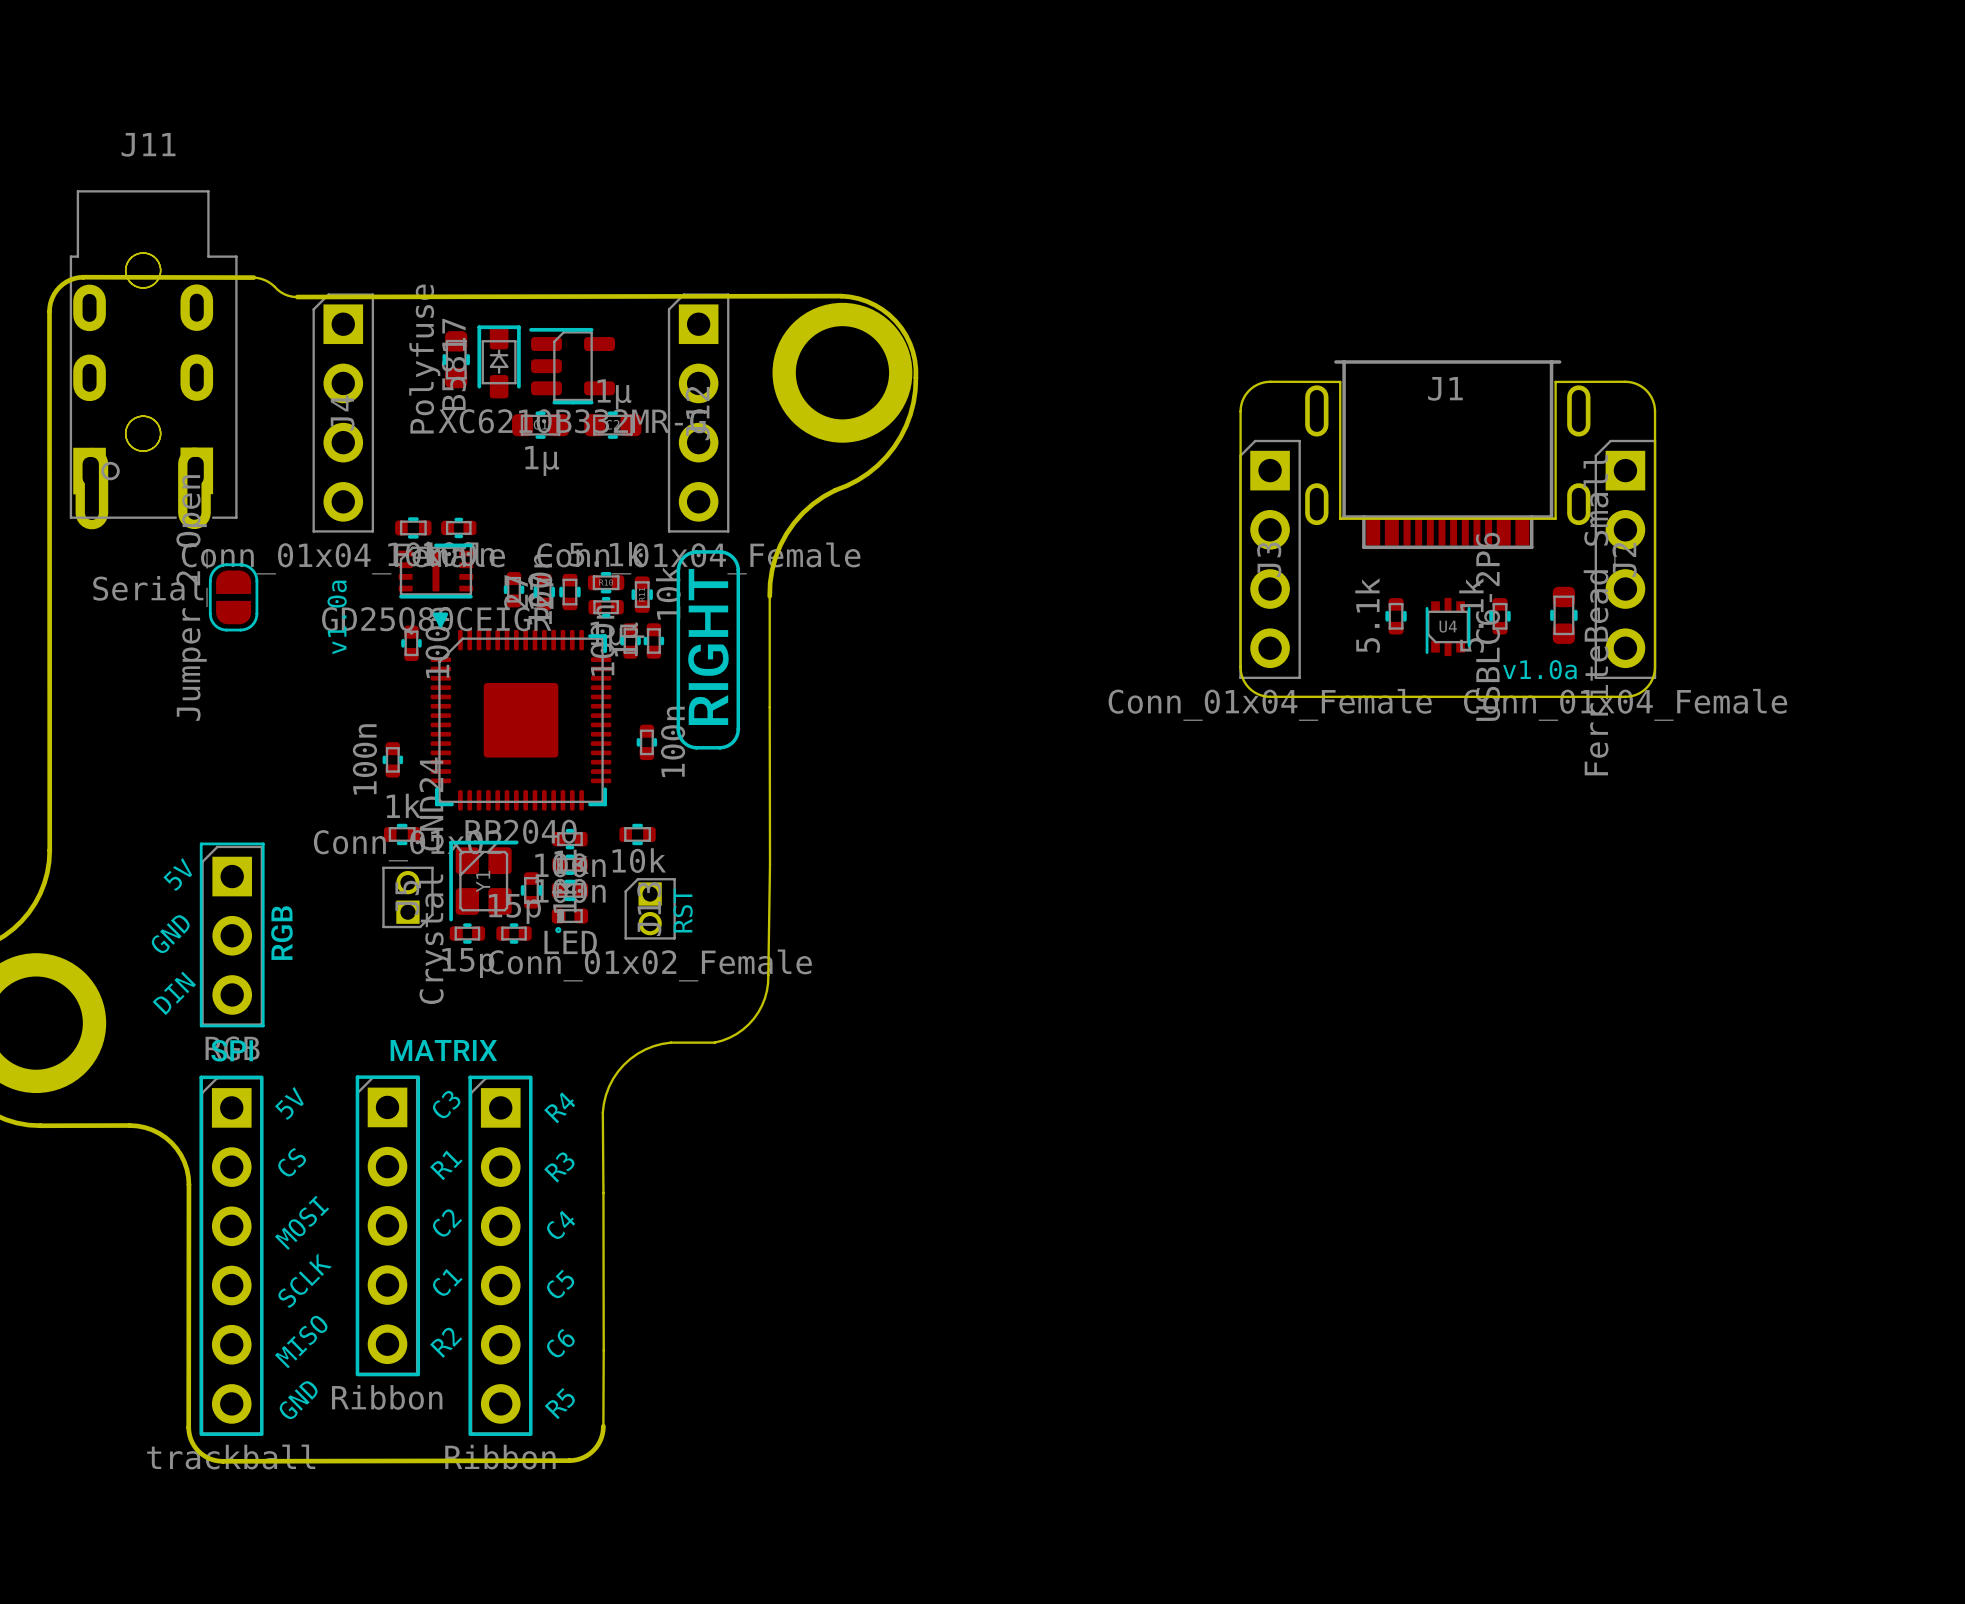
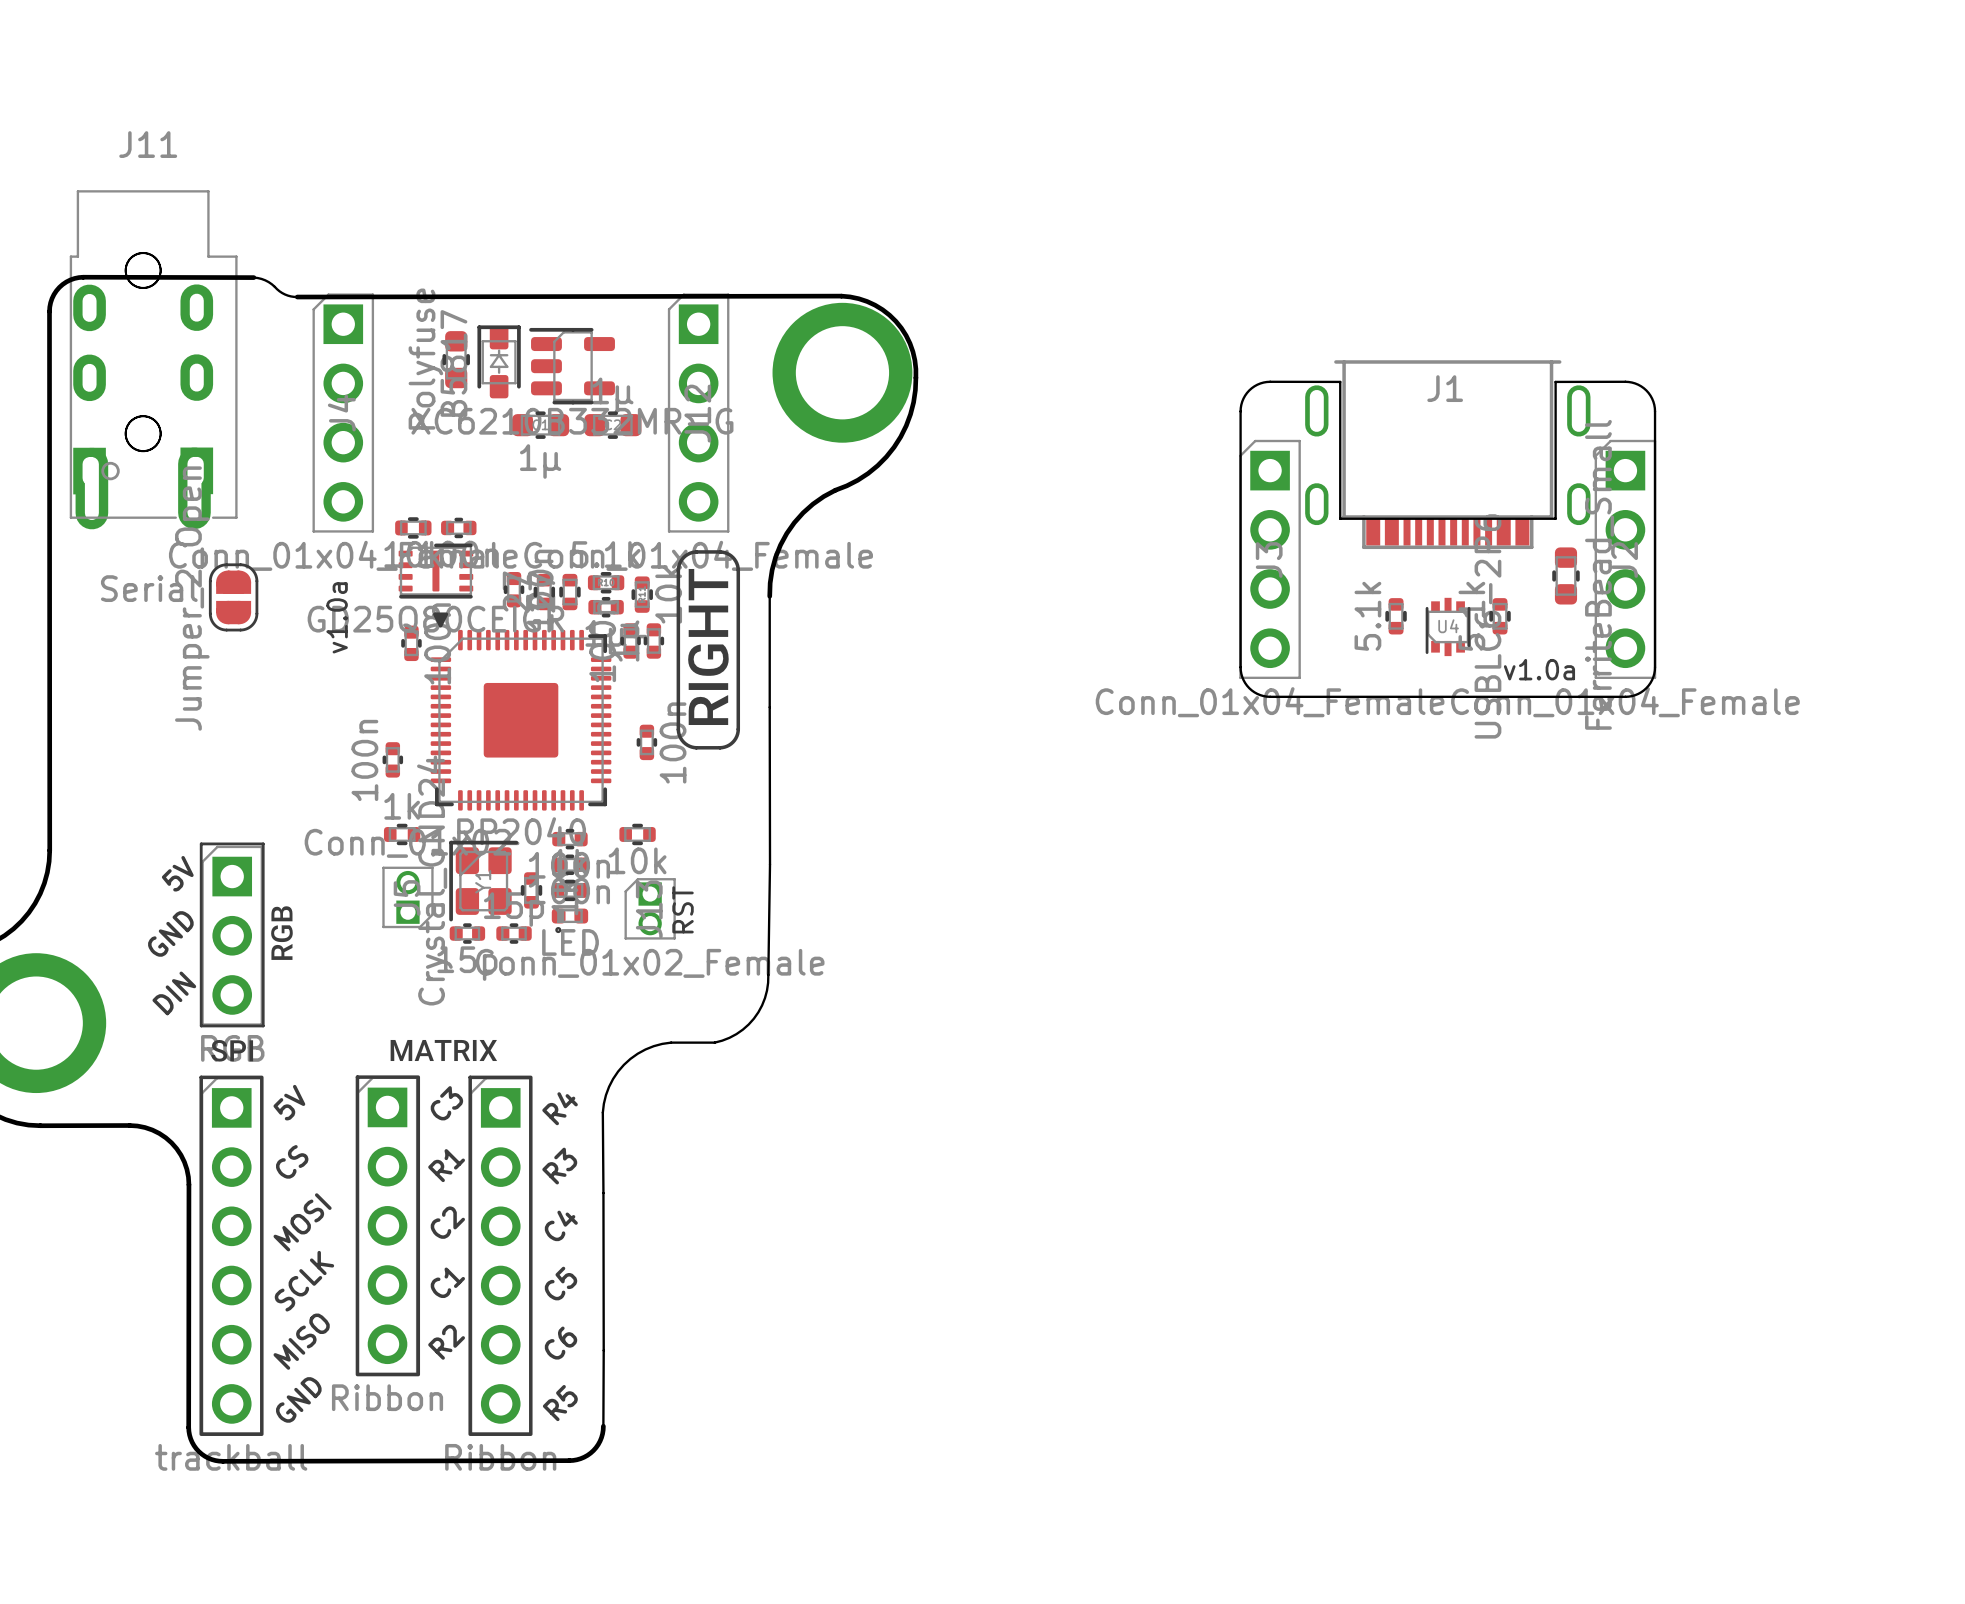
part position: (1563, 615) -> (1565, 575)

